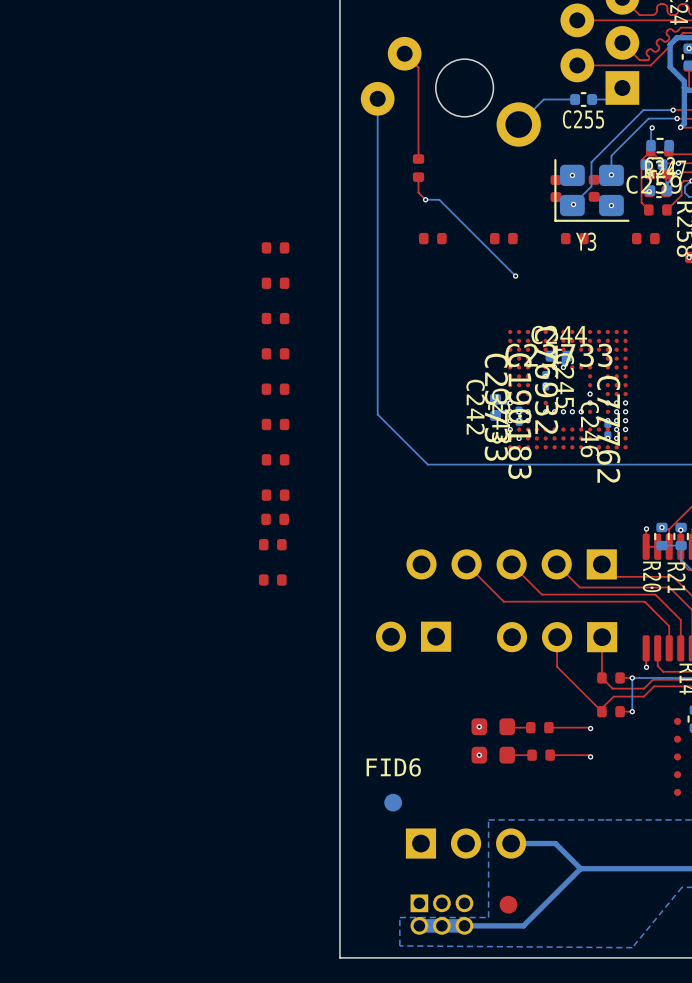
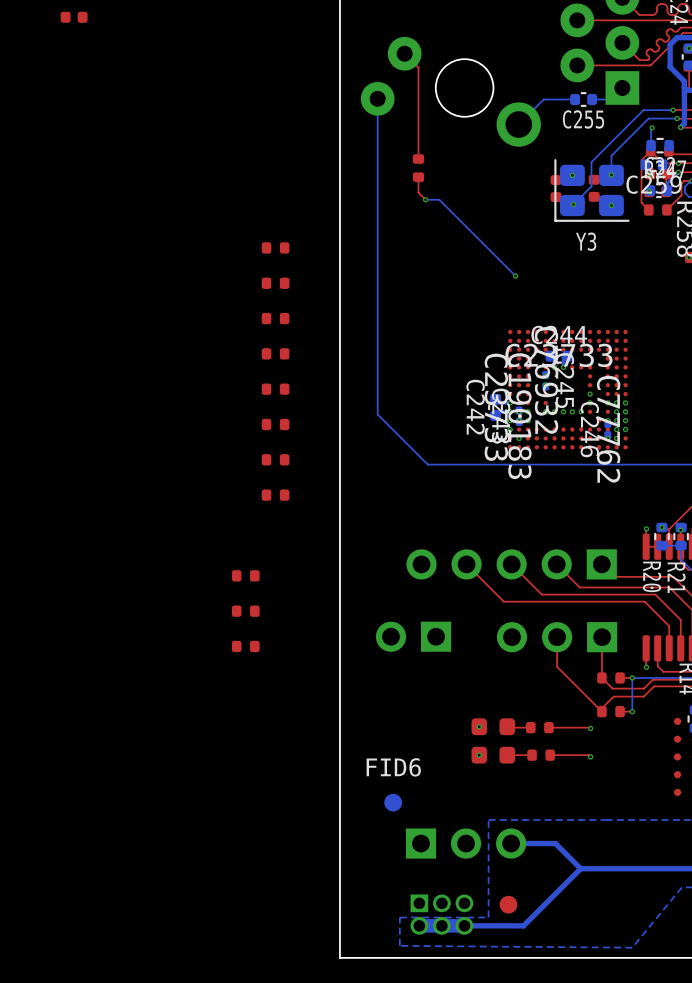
part: none -> (74, 17)
part: (432, 238) -> none
part: (503, 238) -> none
part: (574, 238) -> none
part: (645, 238) -> none
part: (275, 519) -> none
part: (272, 544) -> none
part: none -> (245, 575)
part: (272, 580) -> none
part: none -> (245, 611)
part: none -> (245, 646)

